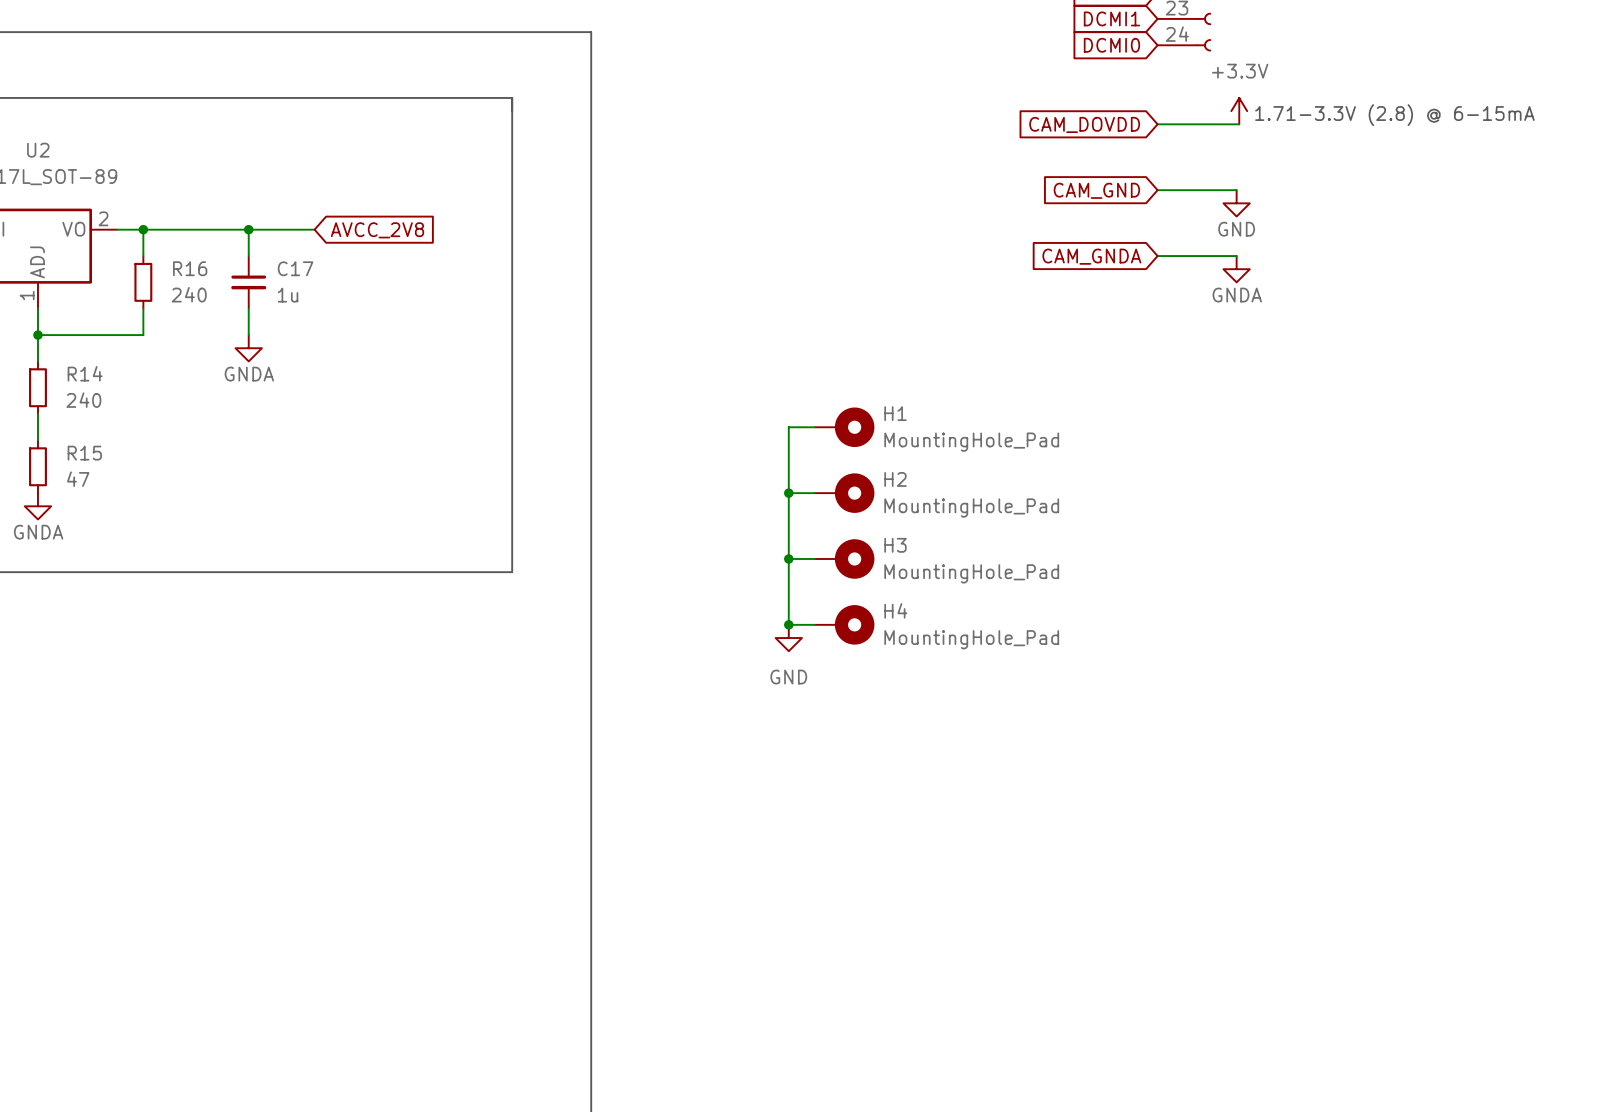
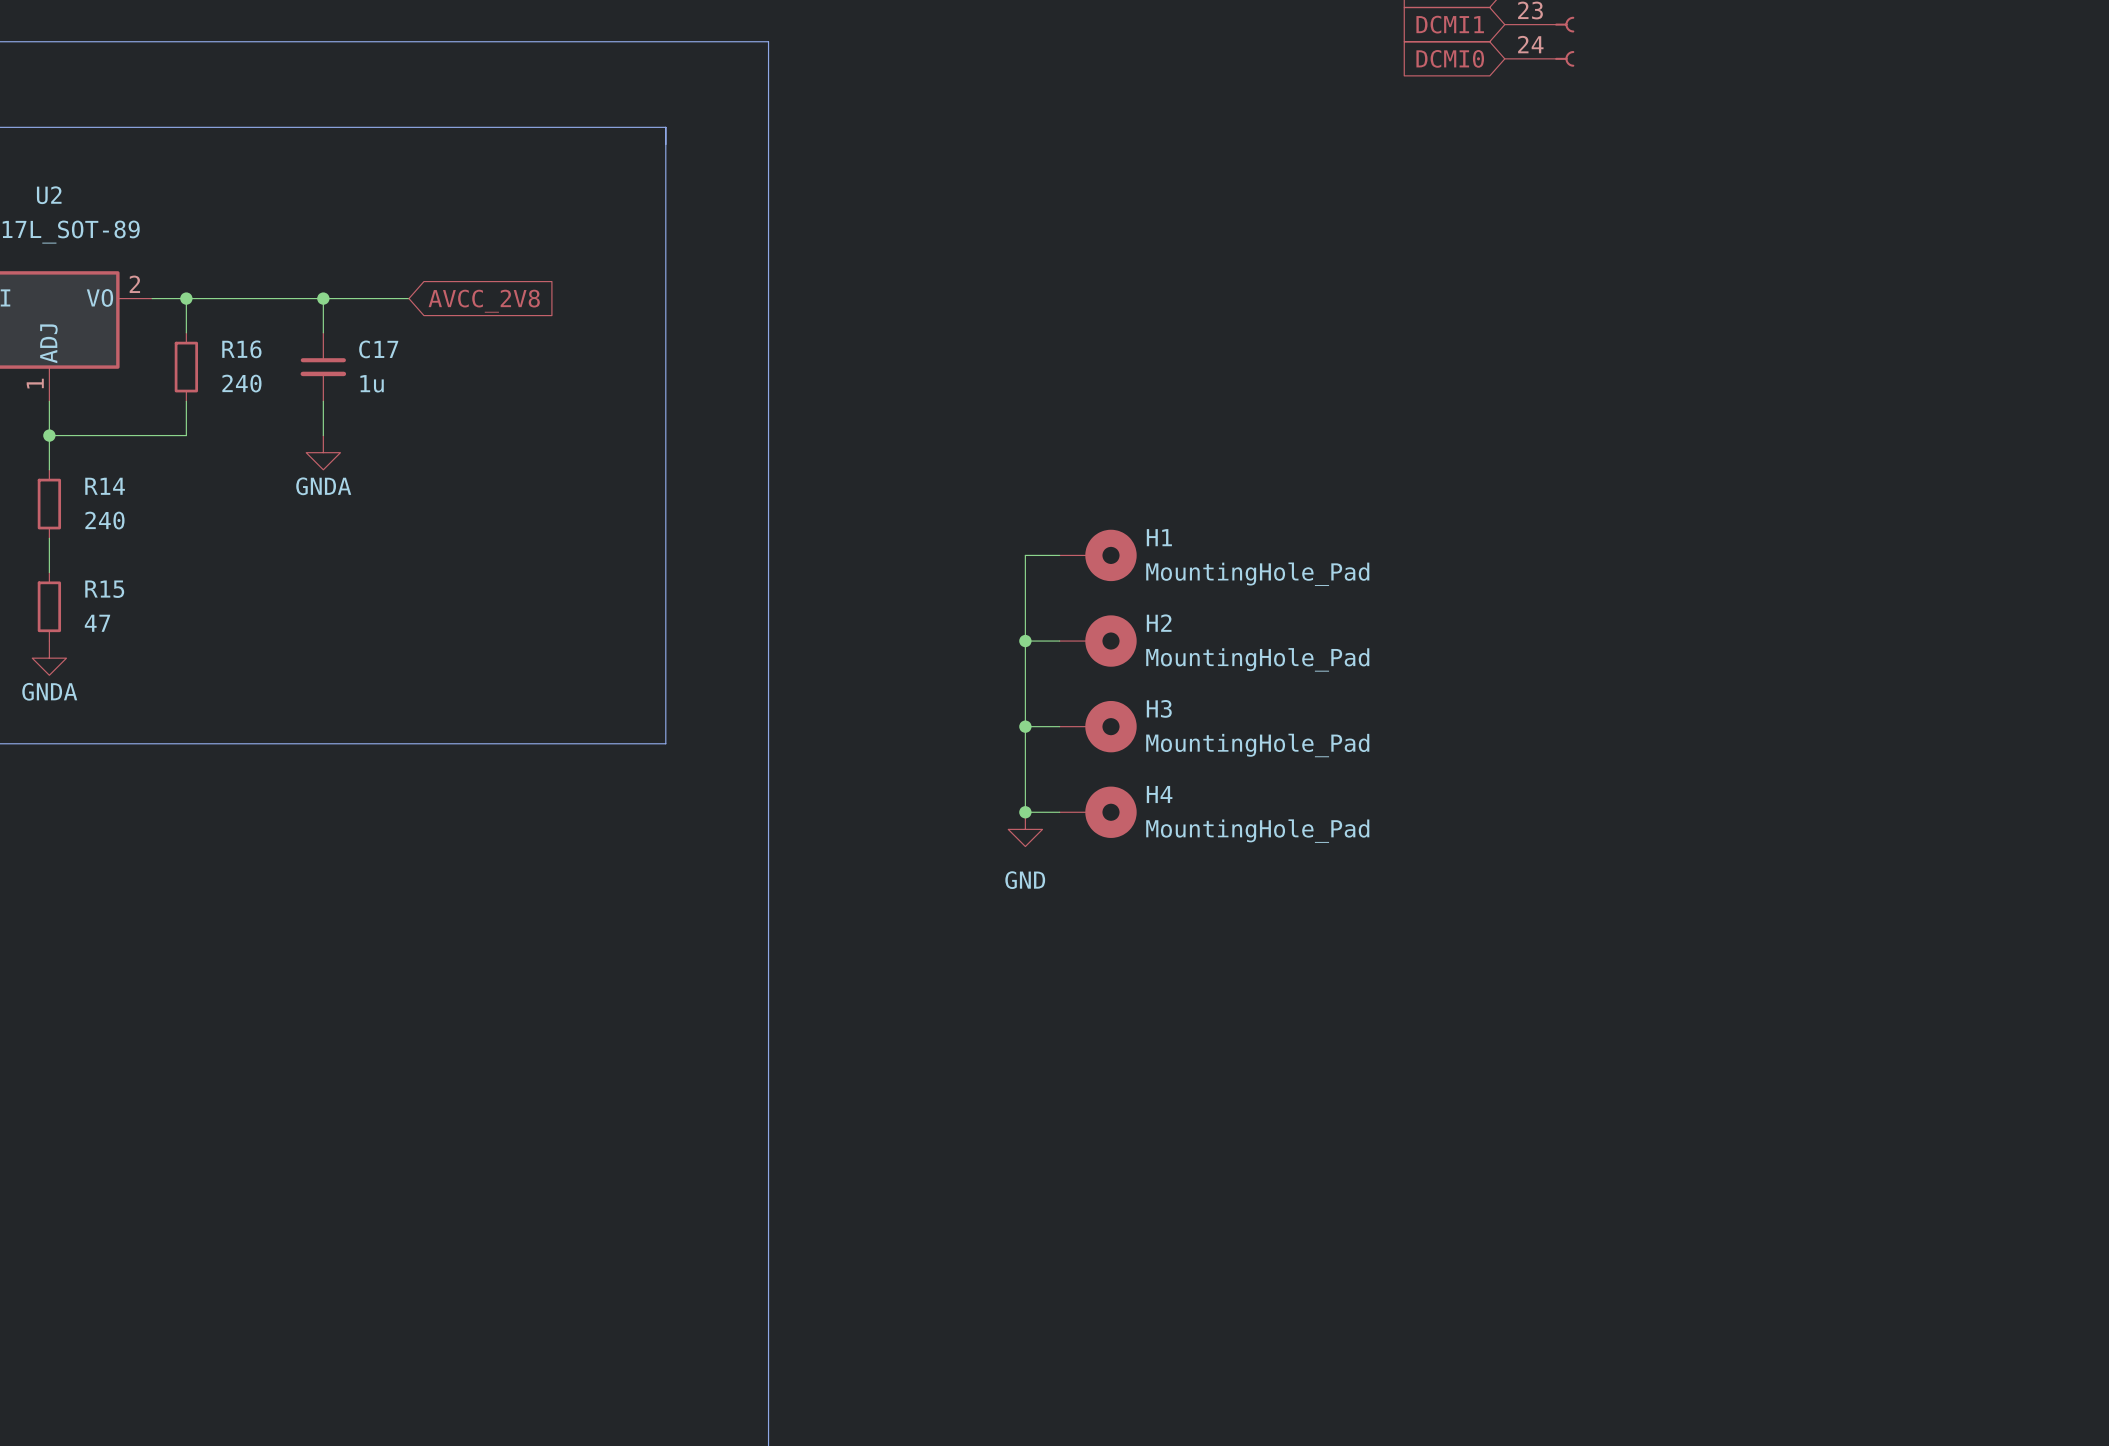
power symbol: +3.3V (1239, 111) -> none
text: 1.71-3.3V (2.8) @ 6-15mA (1394, 115) -> none
global label: CAM_DOVDD (1084, 124) -> none
wire: (1157, 124) (1239, 124) -> none
global label: CAM_GND (1096, 190) -> none
wire: (1157, 190) (1236, 190) -> none
power symbol: GND (1236, 203) -> none
global label: CAM_GNDA (1091, 256) -> none
wire: (1157, 256) (1236, 256) -> none
power symbol: GNDA (1236, 269) -> none

